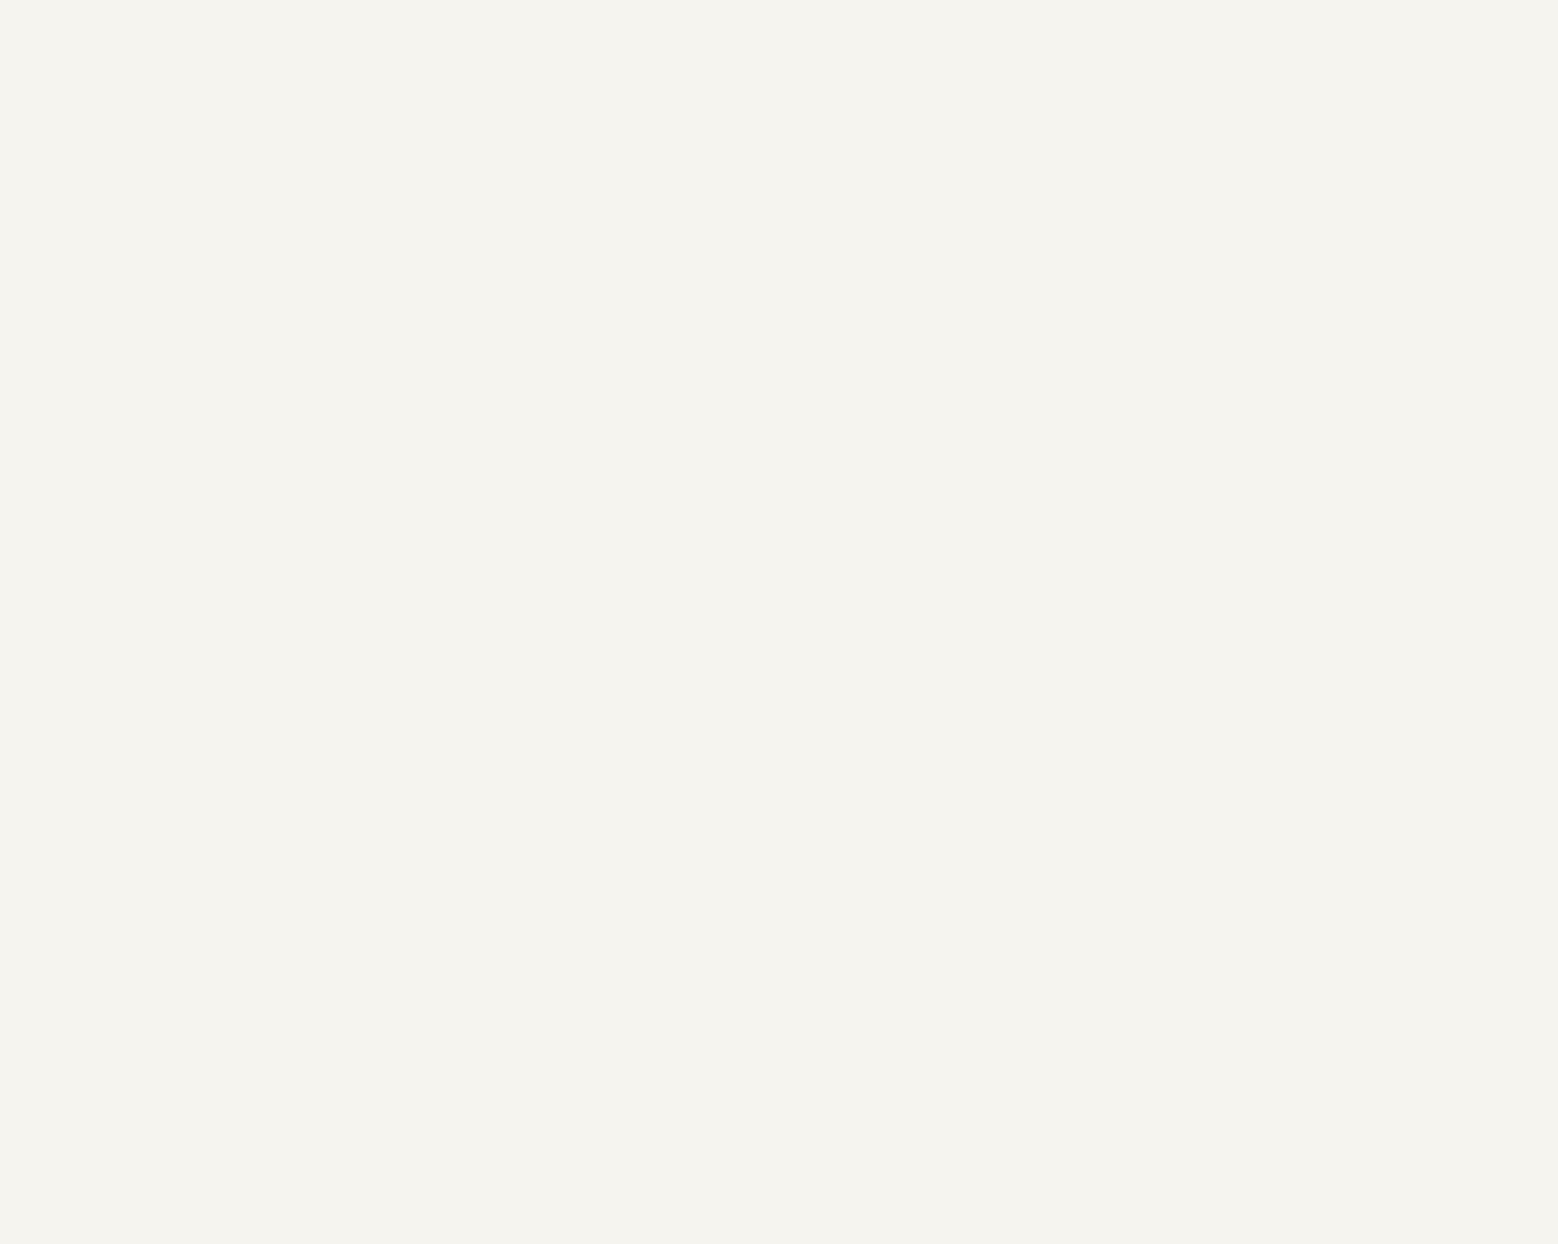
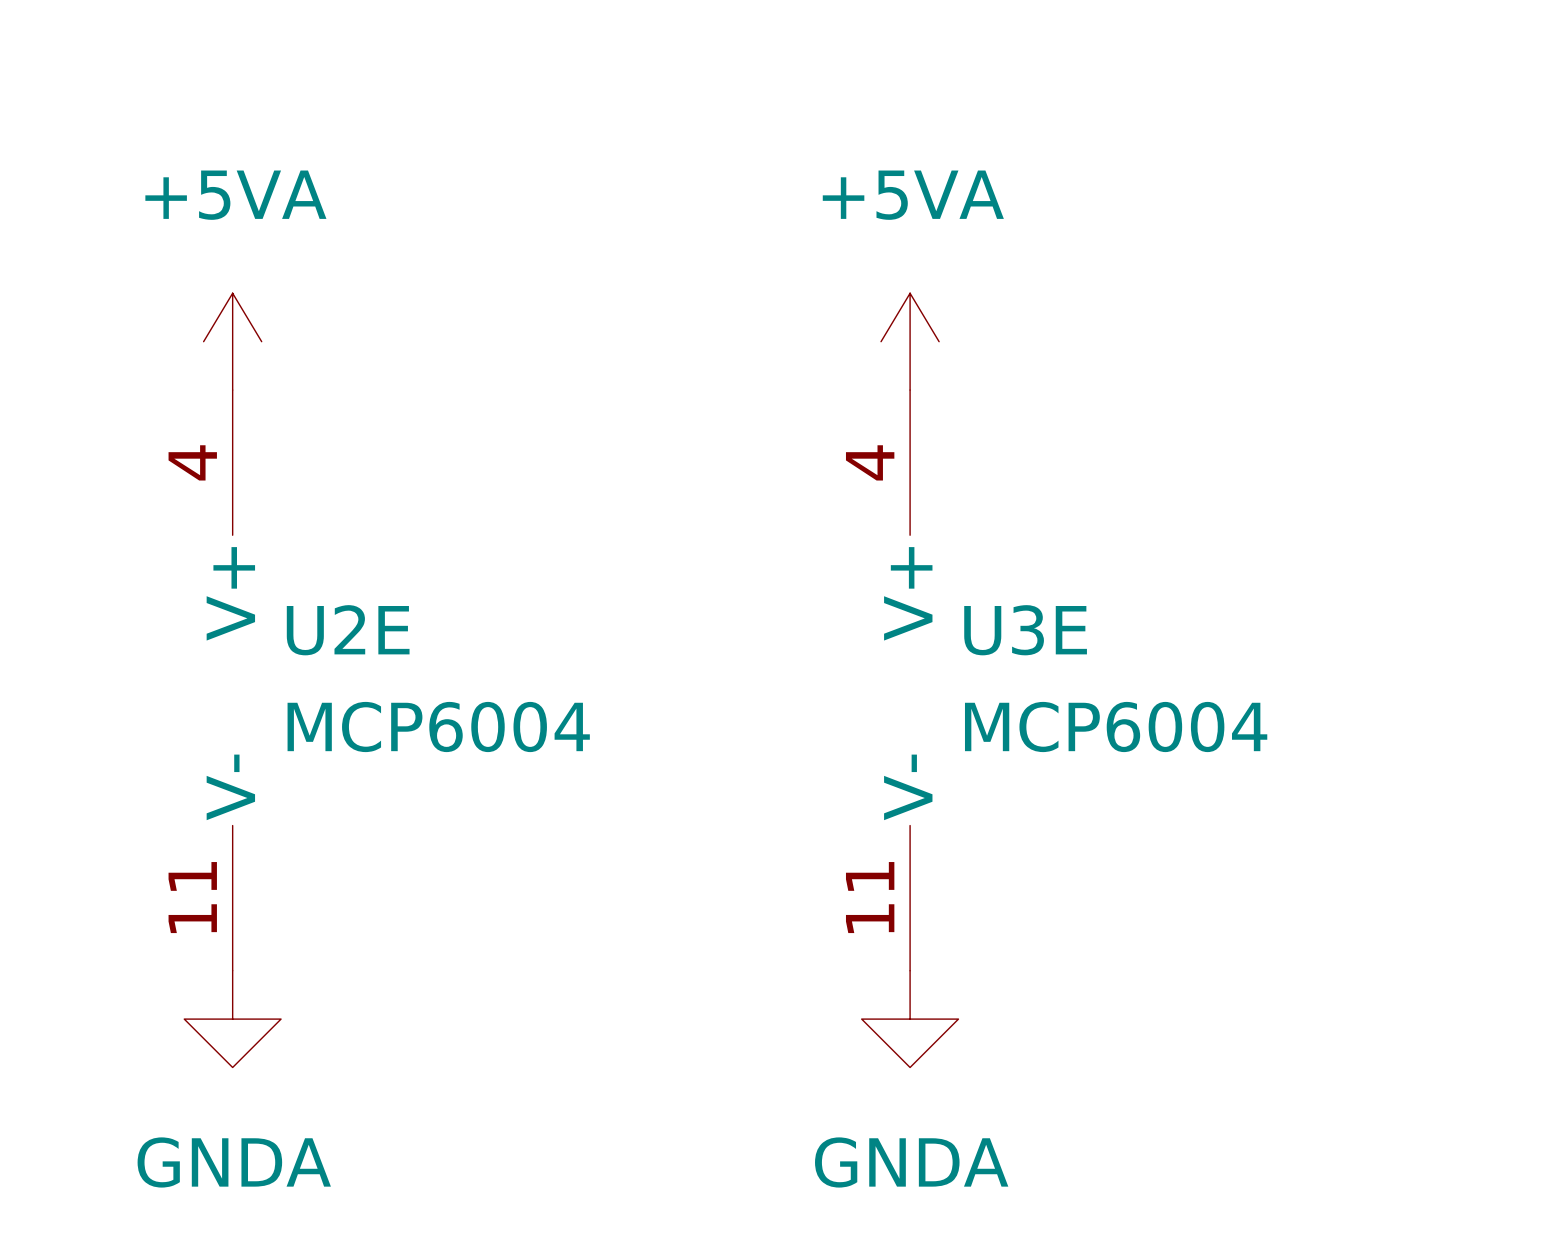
power symbol: none -> +5VA (232, 341)
power symbol: none -> +5VA (910, 341)
U2E: none -> MCP6004 (232, 680)
U3E: none -> MCP6004 (910, 680)
power symbol: none -> GNDA (232, 1019)
power symbol: none -> GNDA (910, 1019)

